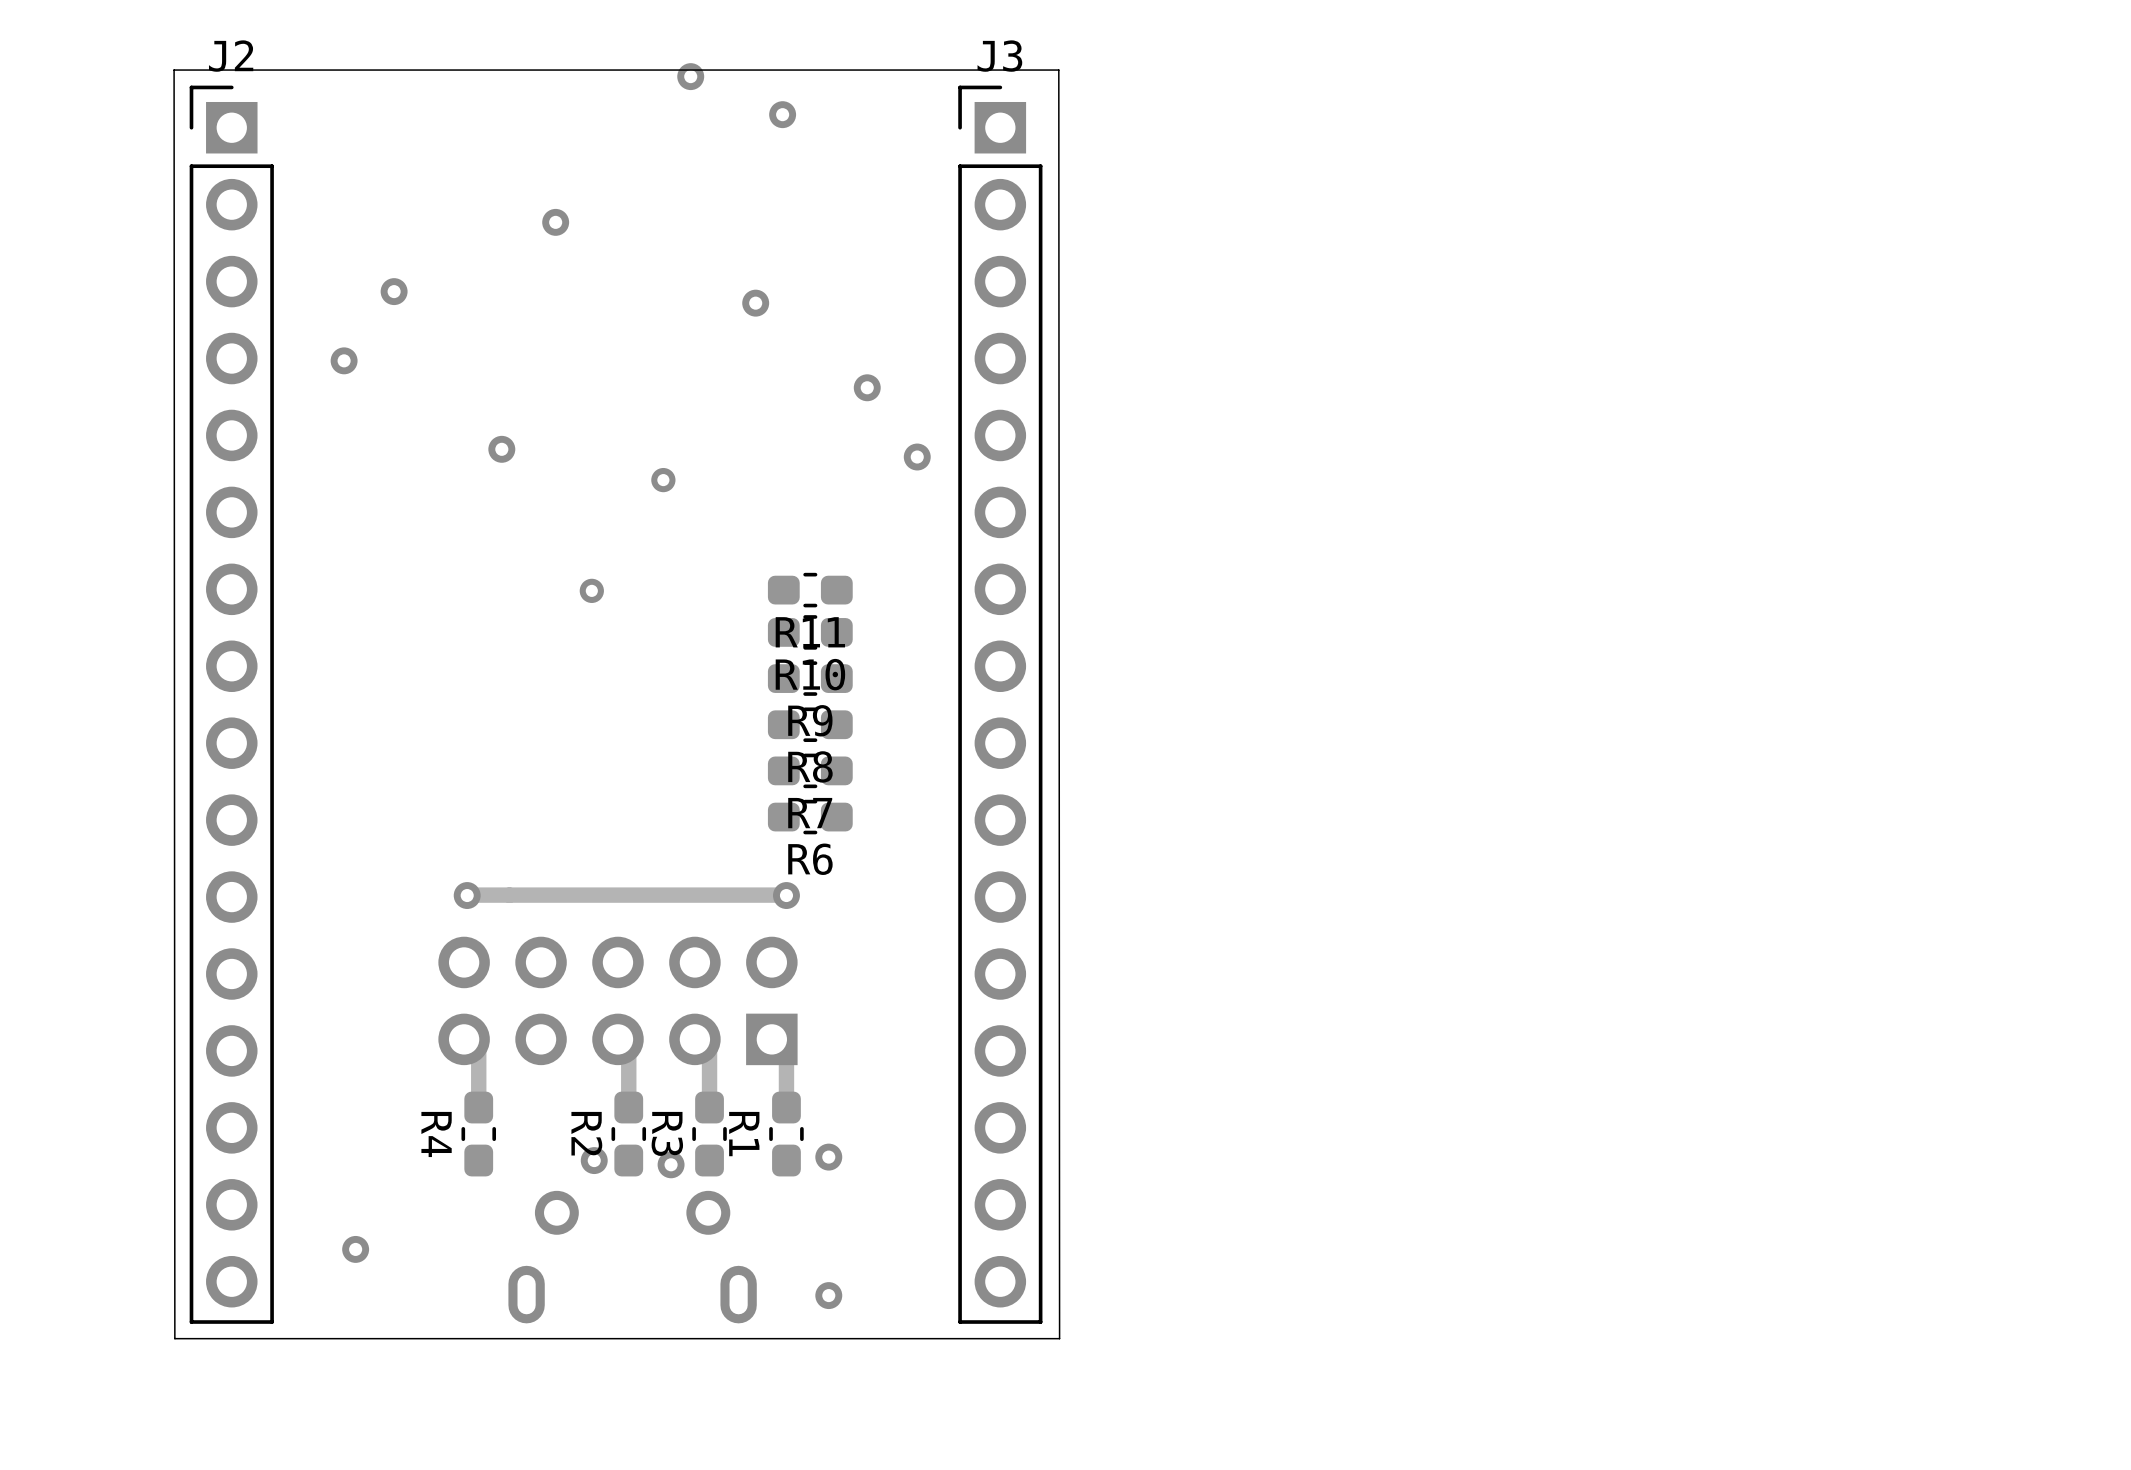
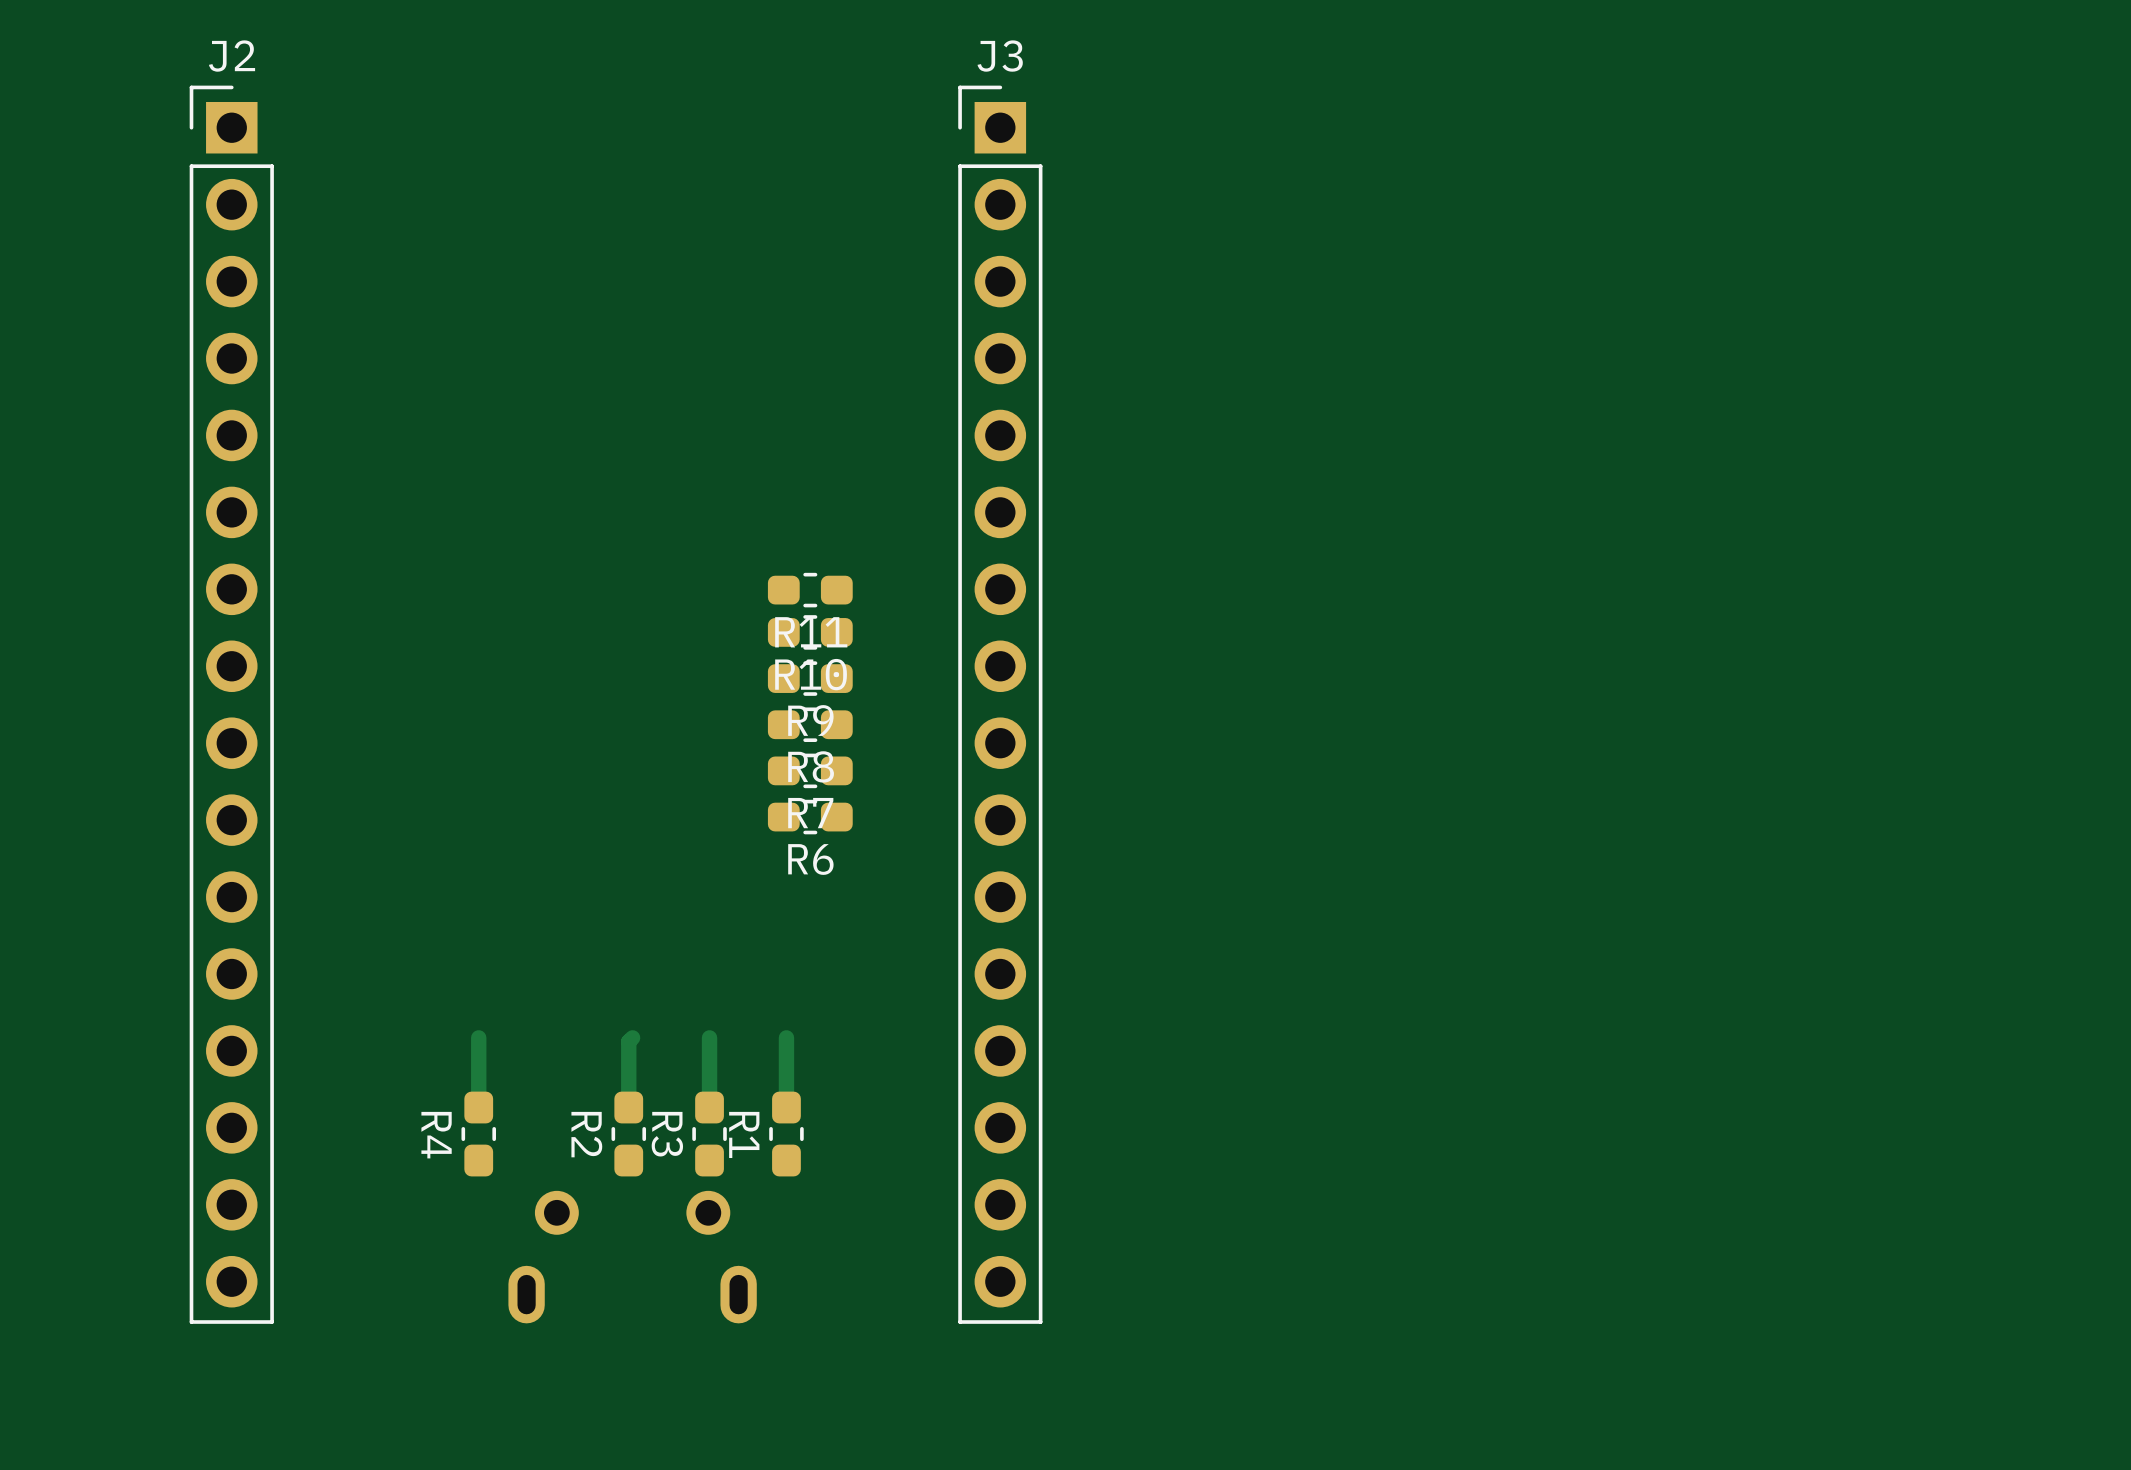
board edge: (1058, 70) (1059, 1338) (174, 1338) (174, 70) (1058, 70) -> none
via: (690, 76) -> none
via: (782, 114) -> none
via: (555, 222) -> none
via: (394, 291) -> none
via: (755, 303) -> none
via: (344, 360) -> none
via: (867, 387) -> none
via: (501, 449) -> none
via: (917, 457) -> none
via: (663, 480) -> none
via: (591, 590) -> none
via: (467, 895) -> none
track: (786, 895) (467, 895) -> none
via: (786, 895) -> none
part: (617, 1000) -> none
via: (828, 1157) -> none
via: (594, 1160) -> none
via: (671, 1164) -> none
via: (355, 1249) -> none
via: (828, 1295) -> none

